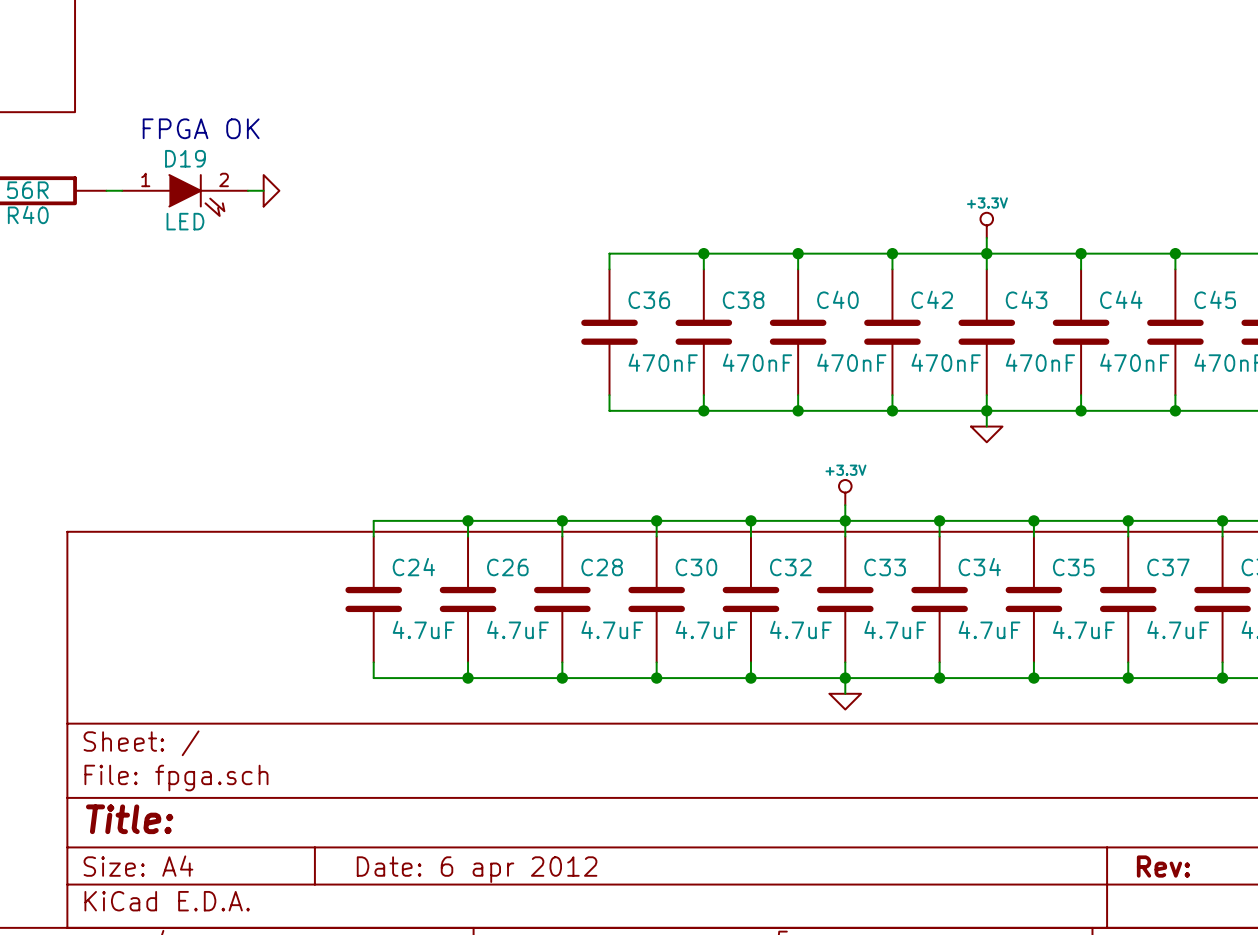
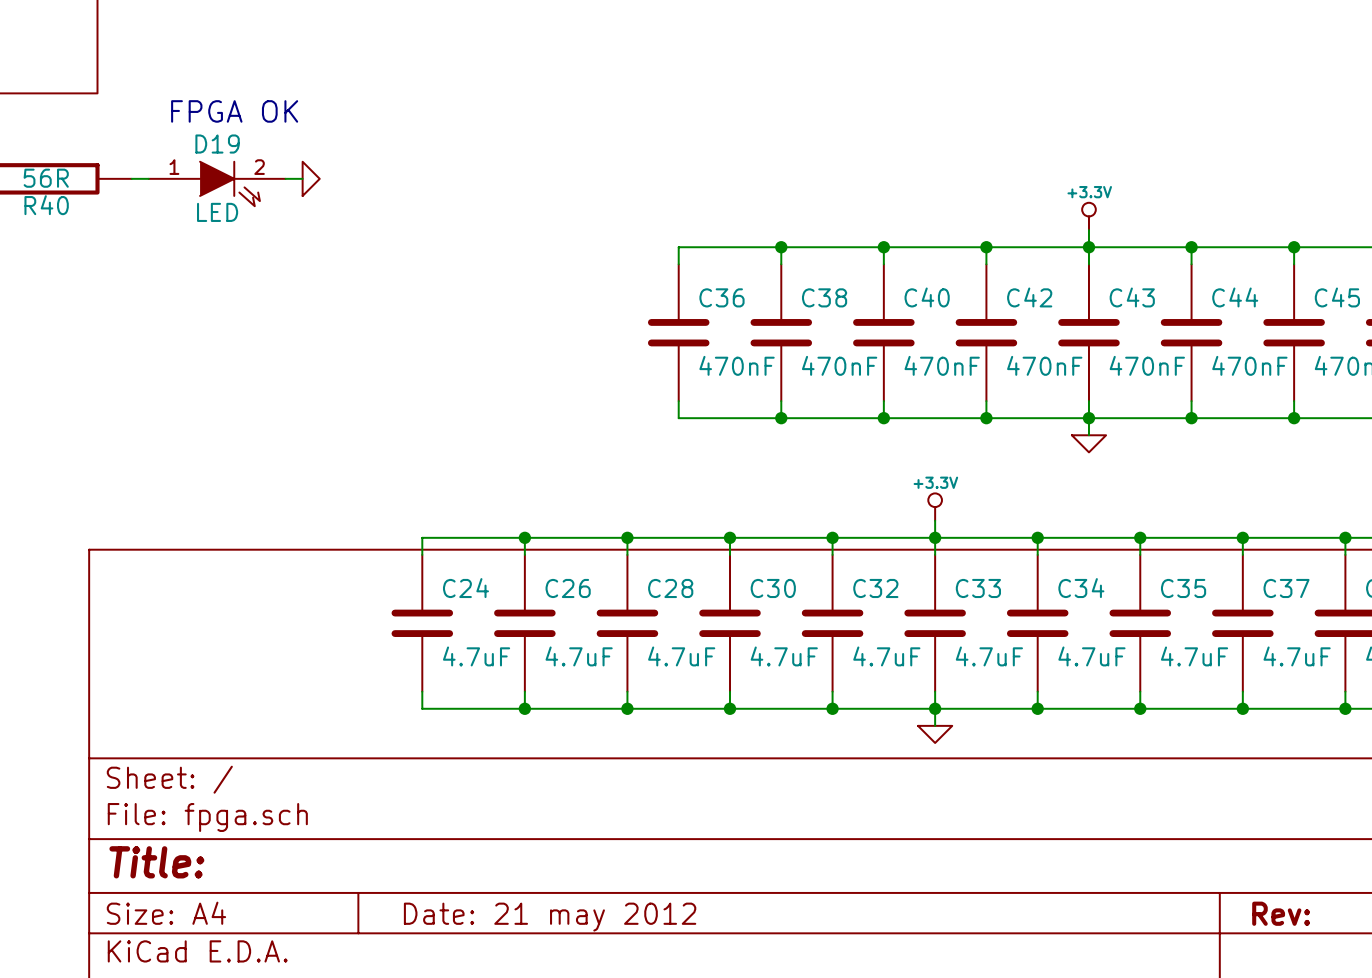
title block: Date: 6 apr 2012 (477, 869) -> Date: 21 may 2012 (550, 917)

